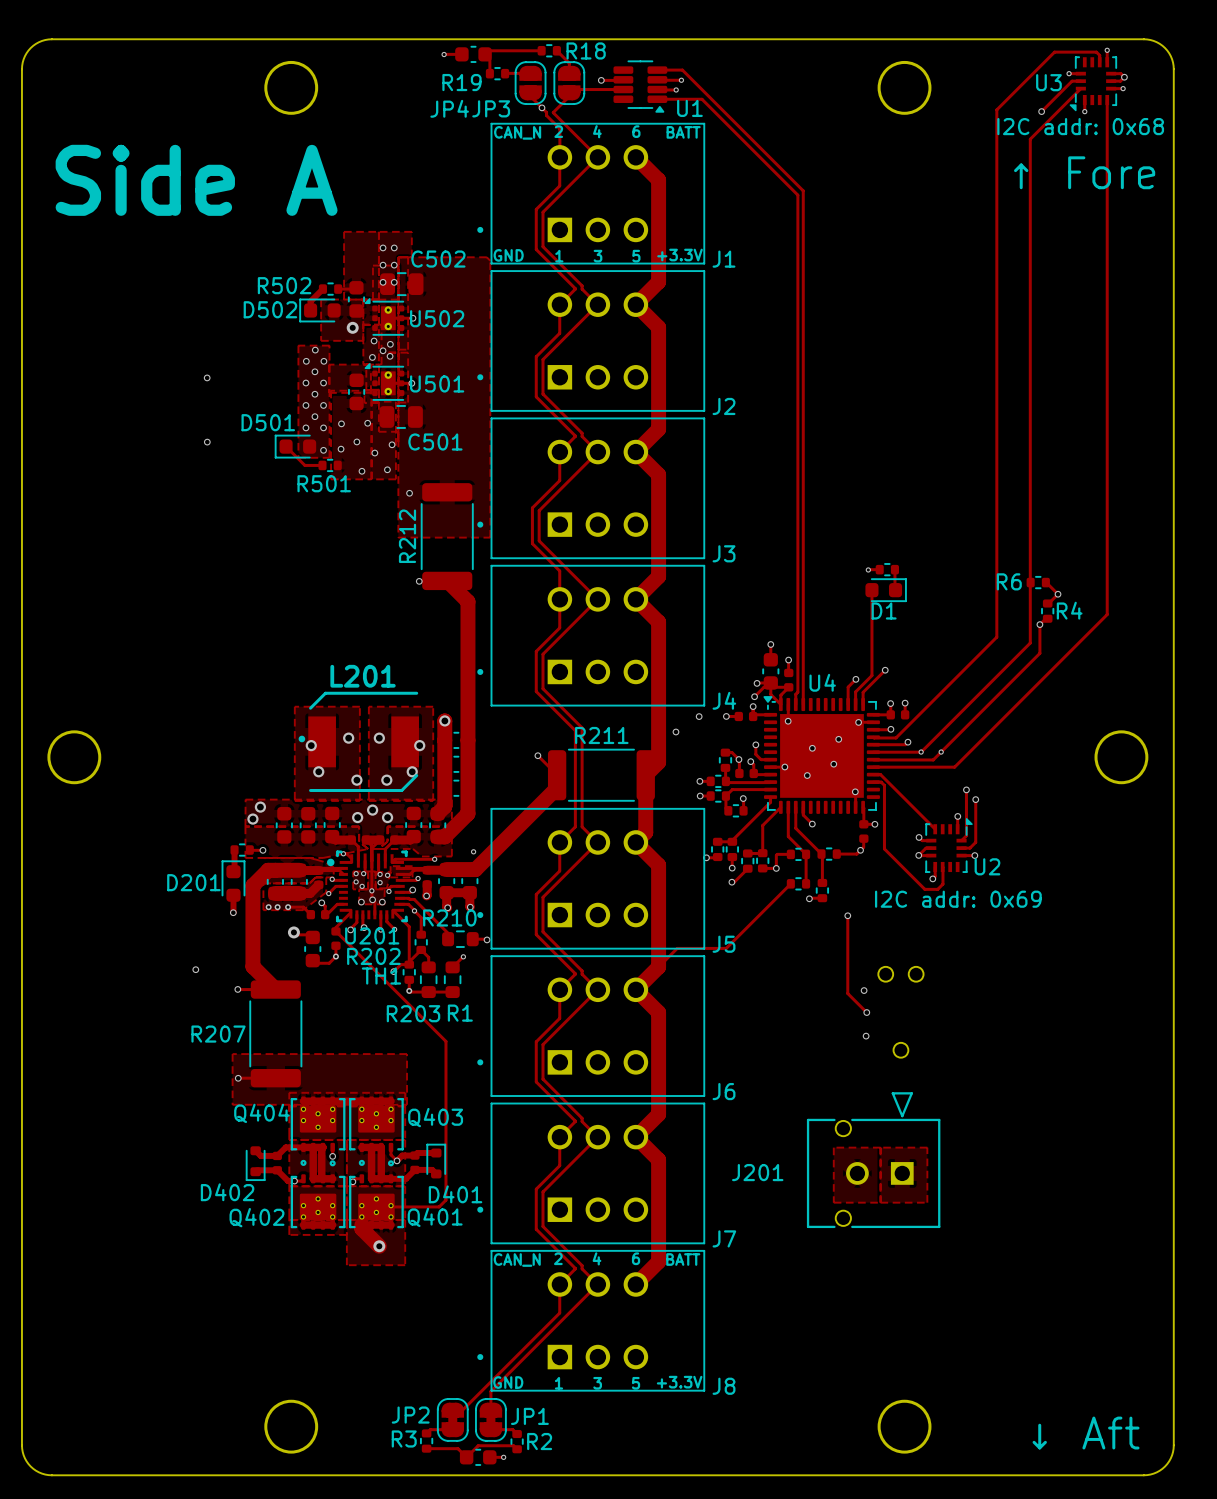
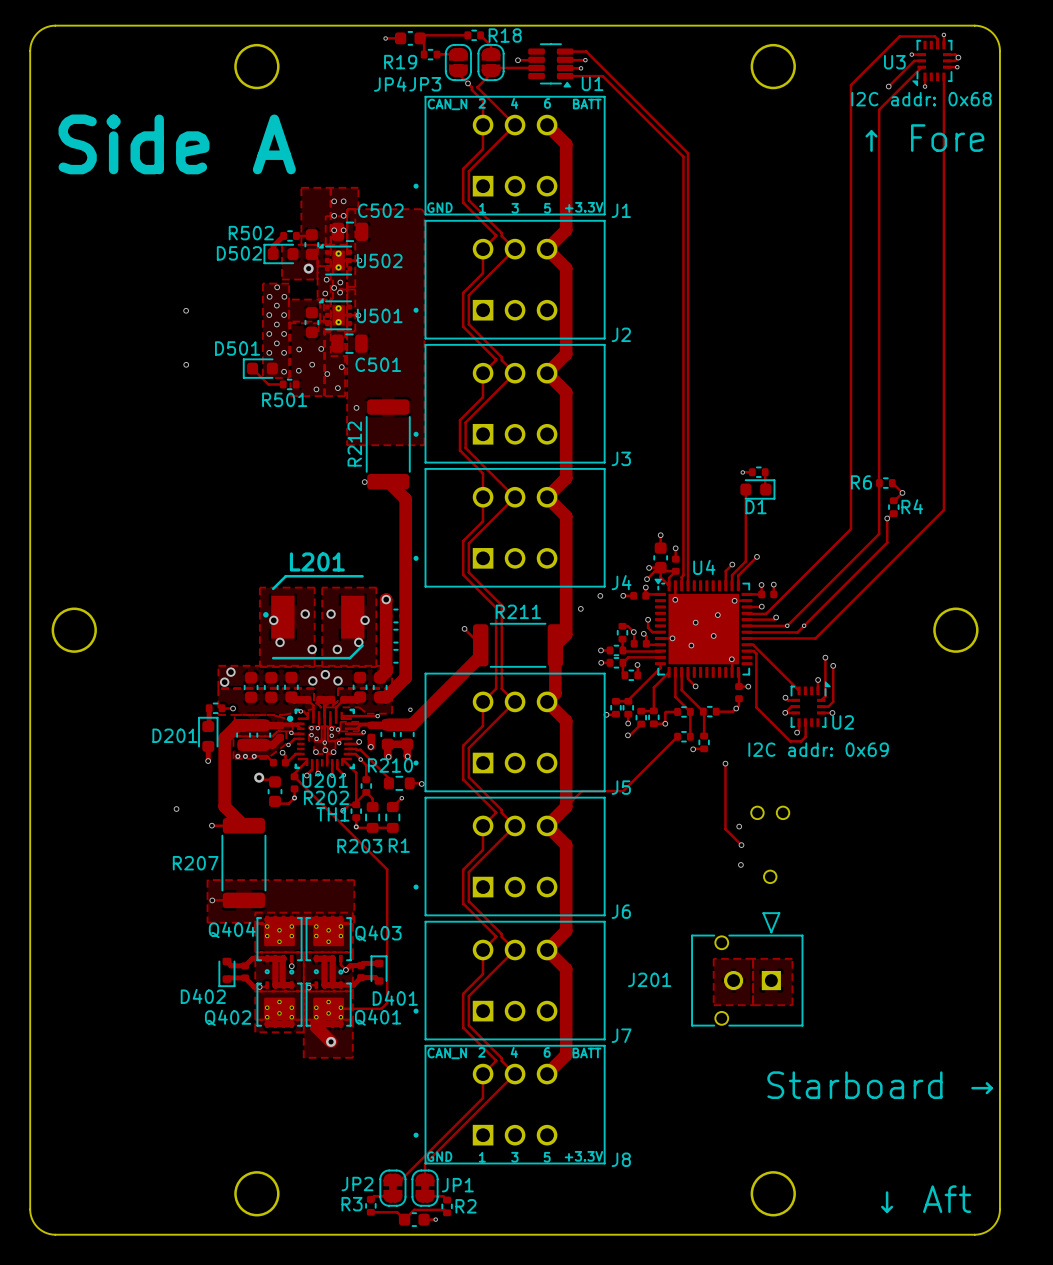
text: none -> Starboard → (880, 1085)

